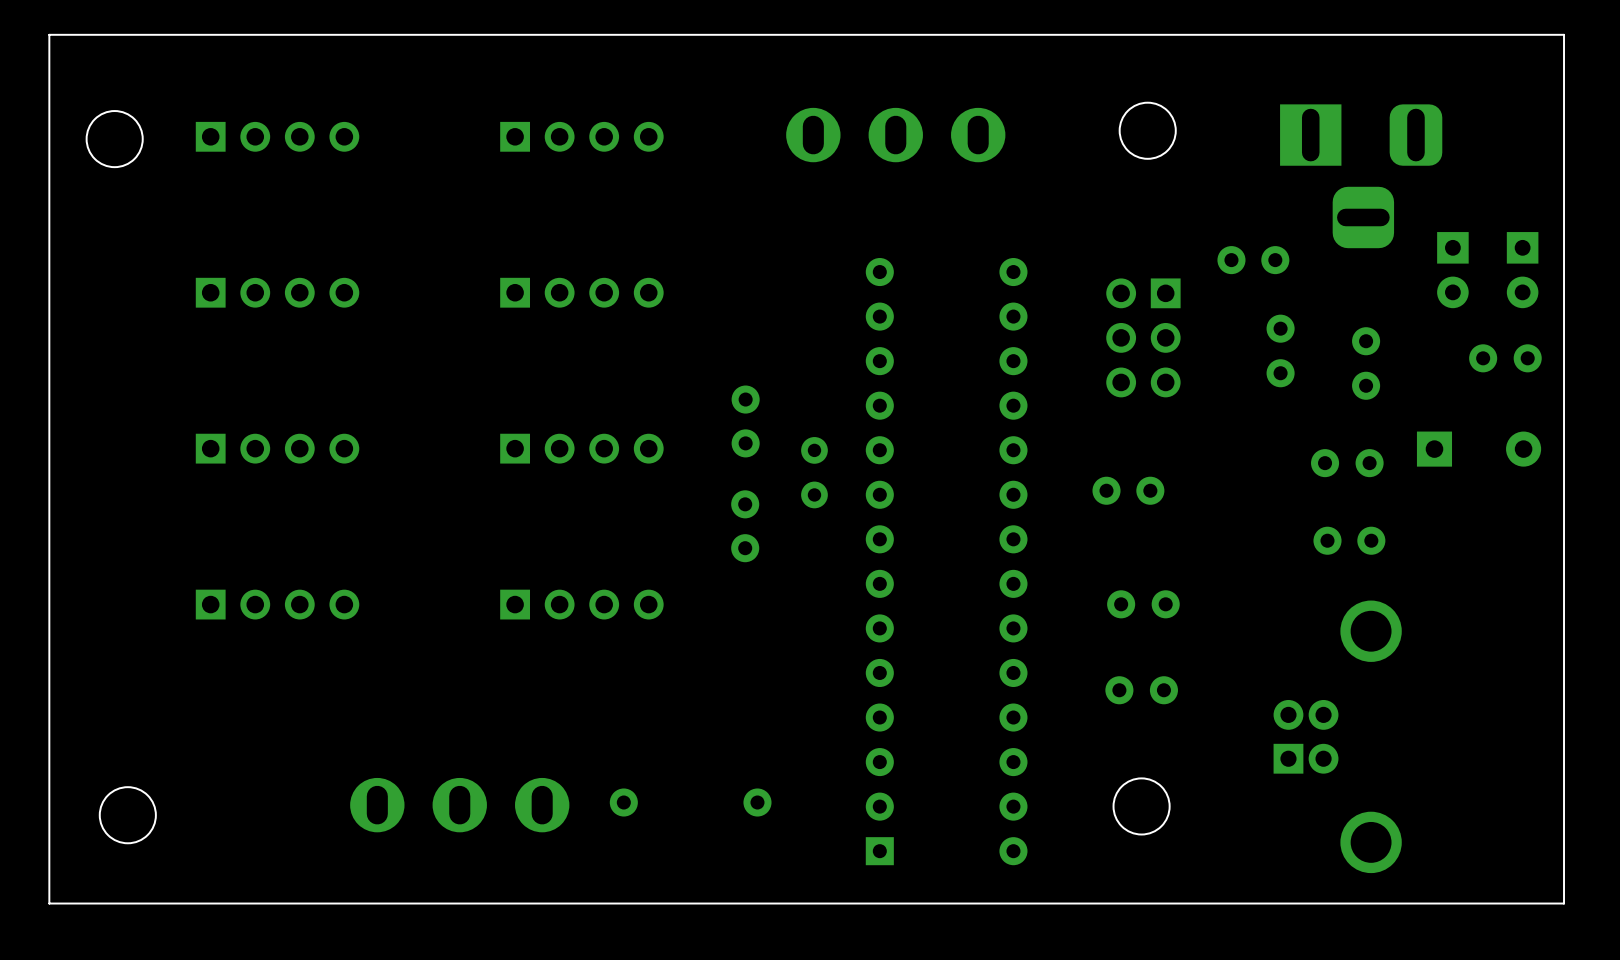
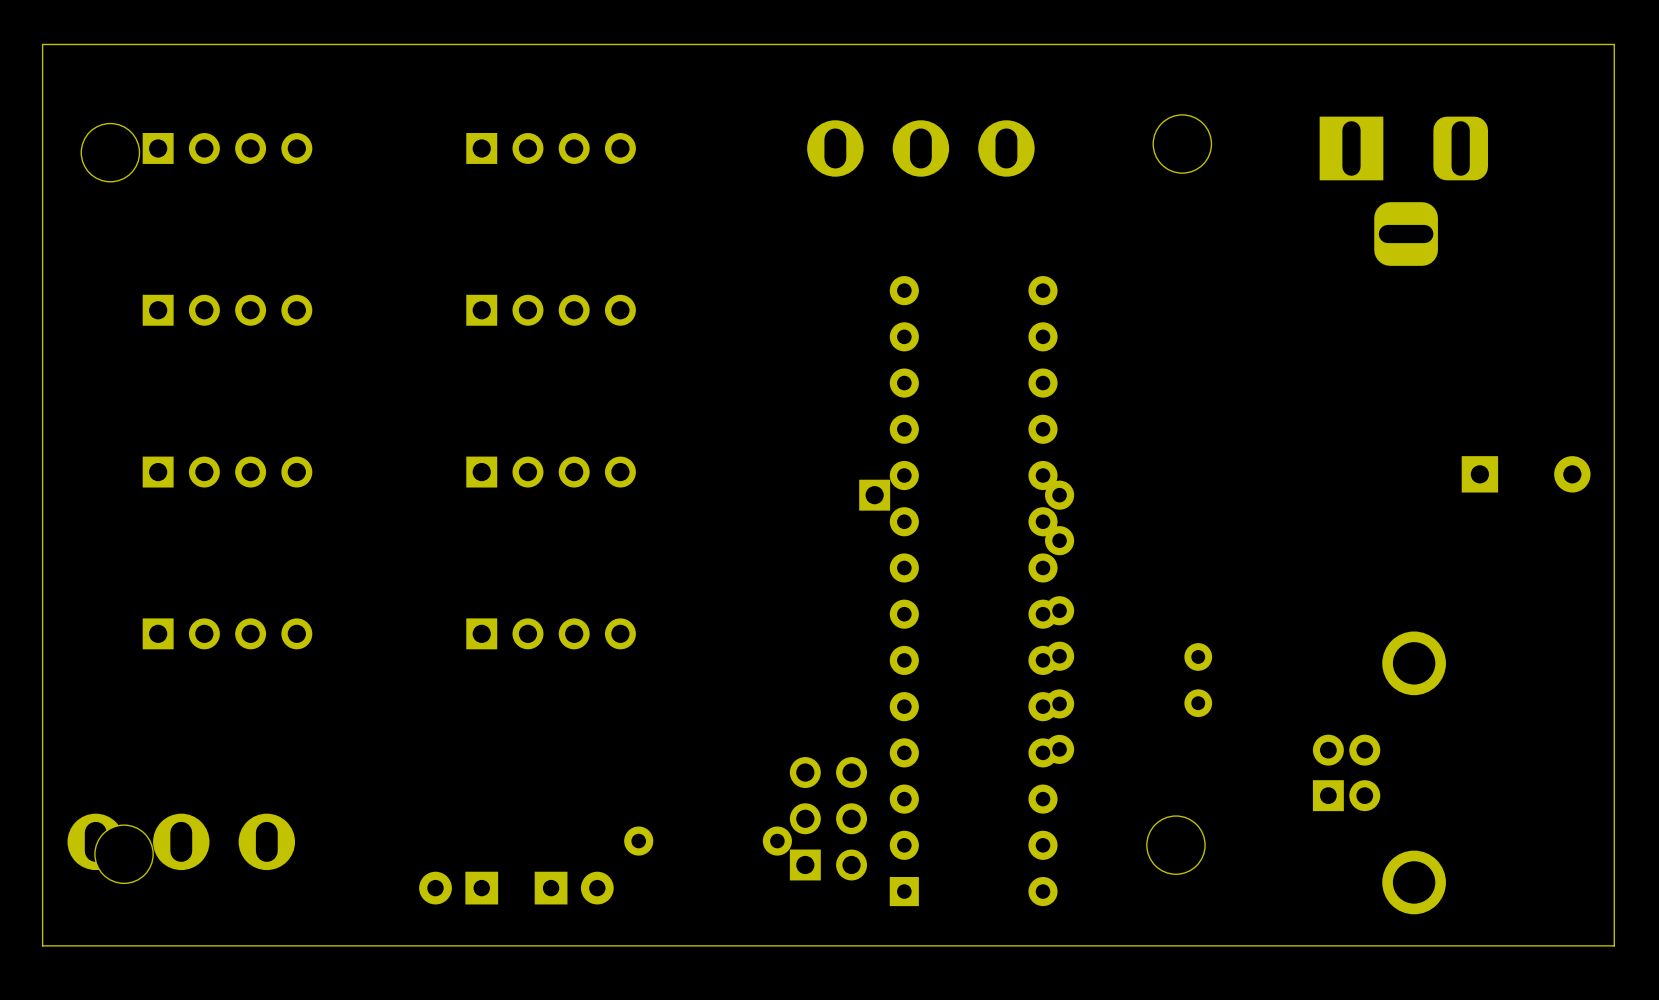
part position: (277, 136) -> (227, 148)
part position: (581, 136) -> (551, 148)
part: (1253, 260) -> none
part: (1452, 270) -> none
part: (1522, 270) -> none
part position: (277, 292) -> (227, 310)
part position: (581, 292) -> (551, 310)
part: (1143, 337) -> none
part: (1280, 350) -> none
part: (1505, 358) -> none
part: (1366, 363) -> none
part: (745, 421) -> none
part position: (277, 448) -> (227, 472)
part position: (581, 448) -> (551, 472)
part: (1347, 463) -> none
part: none -> (874, 495)
part position: (814, 472) -> (1198, 680)
part: (1128, 490) -> none
part: none -> (1059, 517)
part: (745, 526) -> none
part: (1349, 540) -> none
part: none -> (1059, 633)
part position: (277, 604) -> (227, 633)
part position: (581, 604) -> (551, 633)
part: (1143, 604) -> none
part: (1141, 690) -> none
part: none -> (1059, 726)
part: none -> (828, 818)
part position: (459, 805) -> (181, 841)
part: none -> (458, 888)
part: none -> (574, 888)

